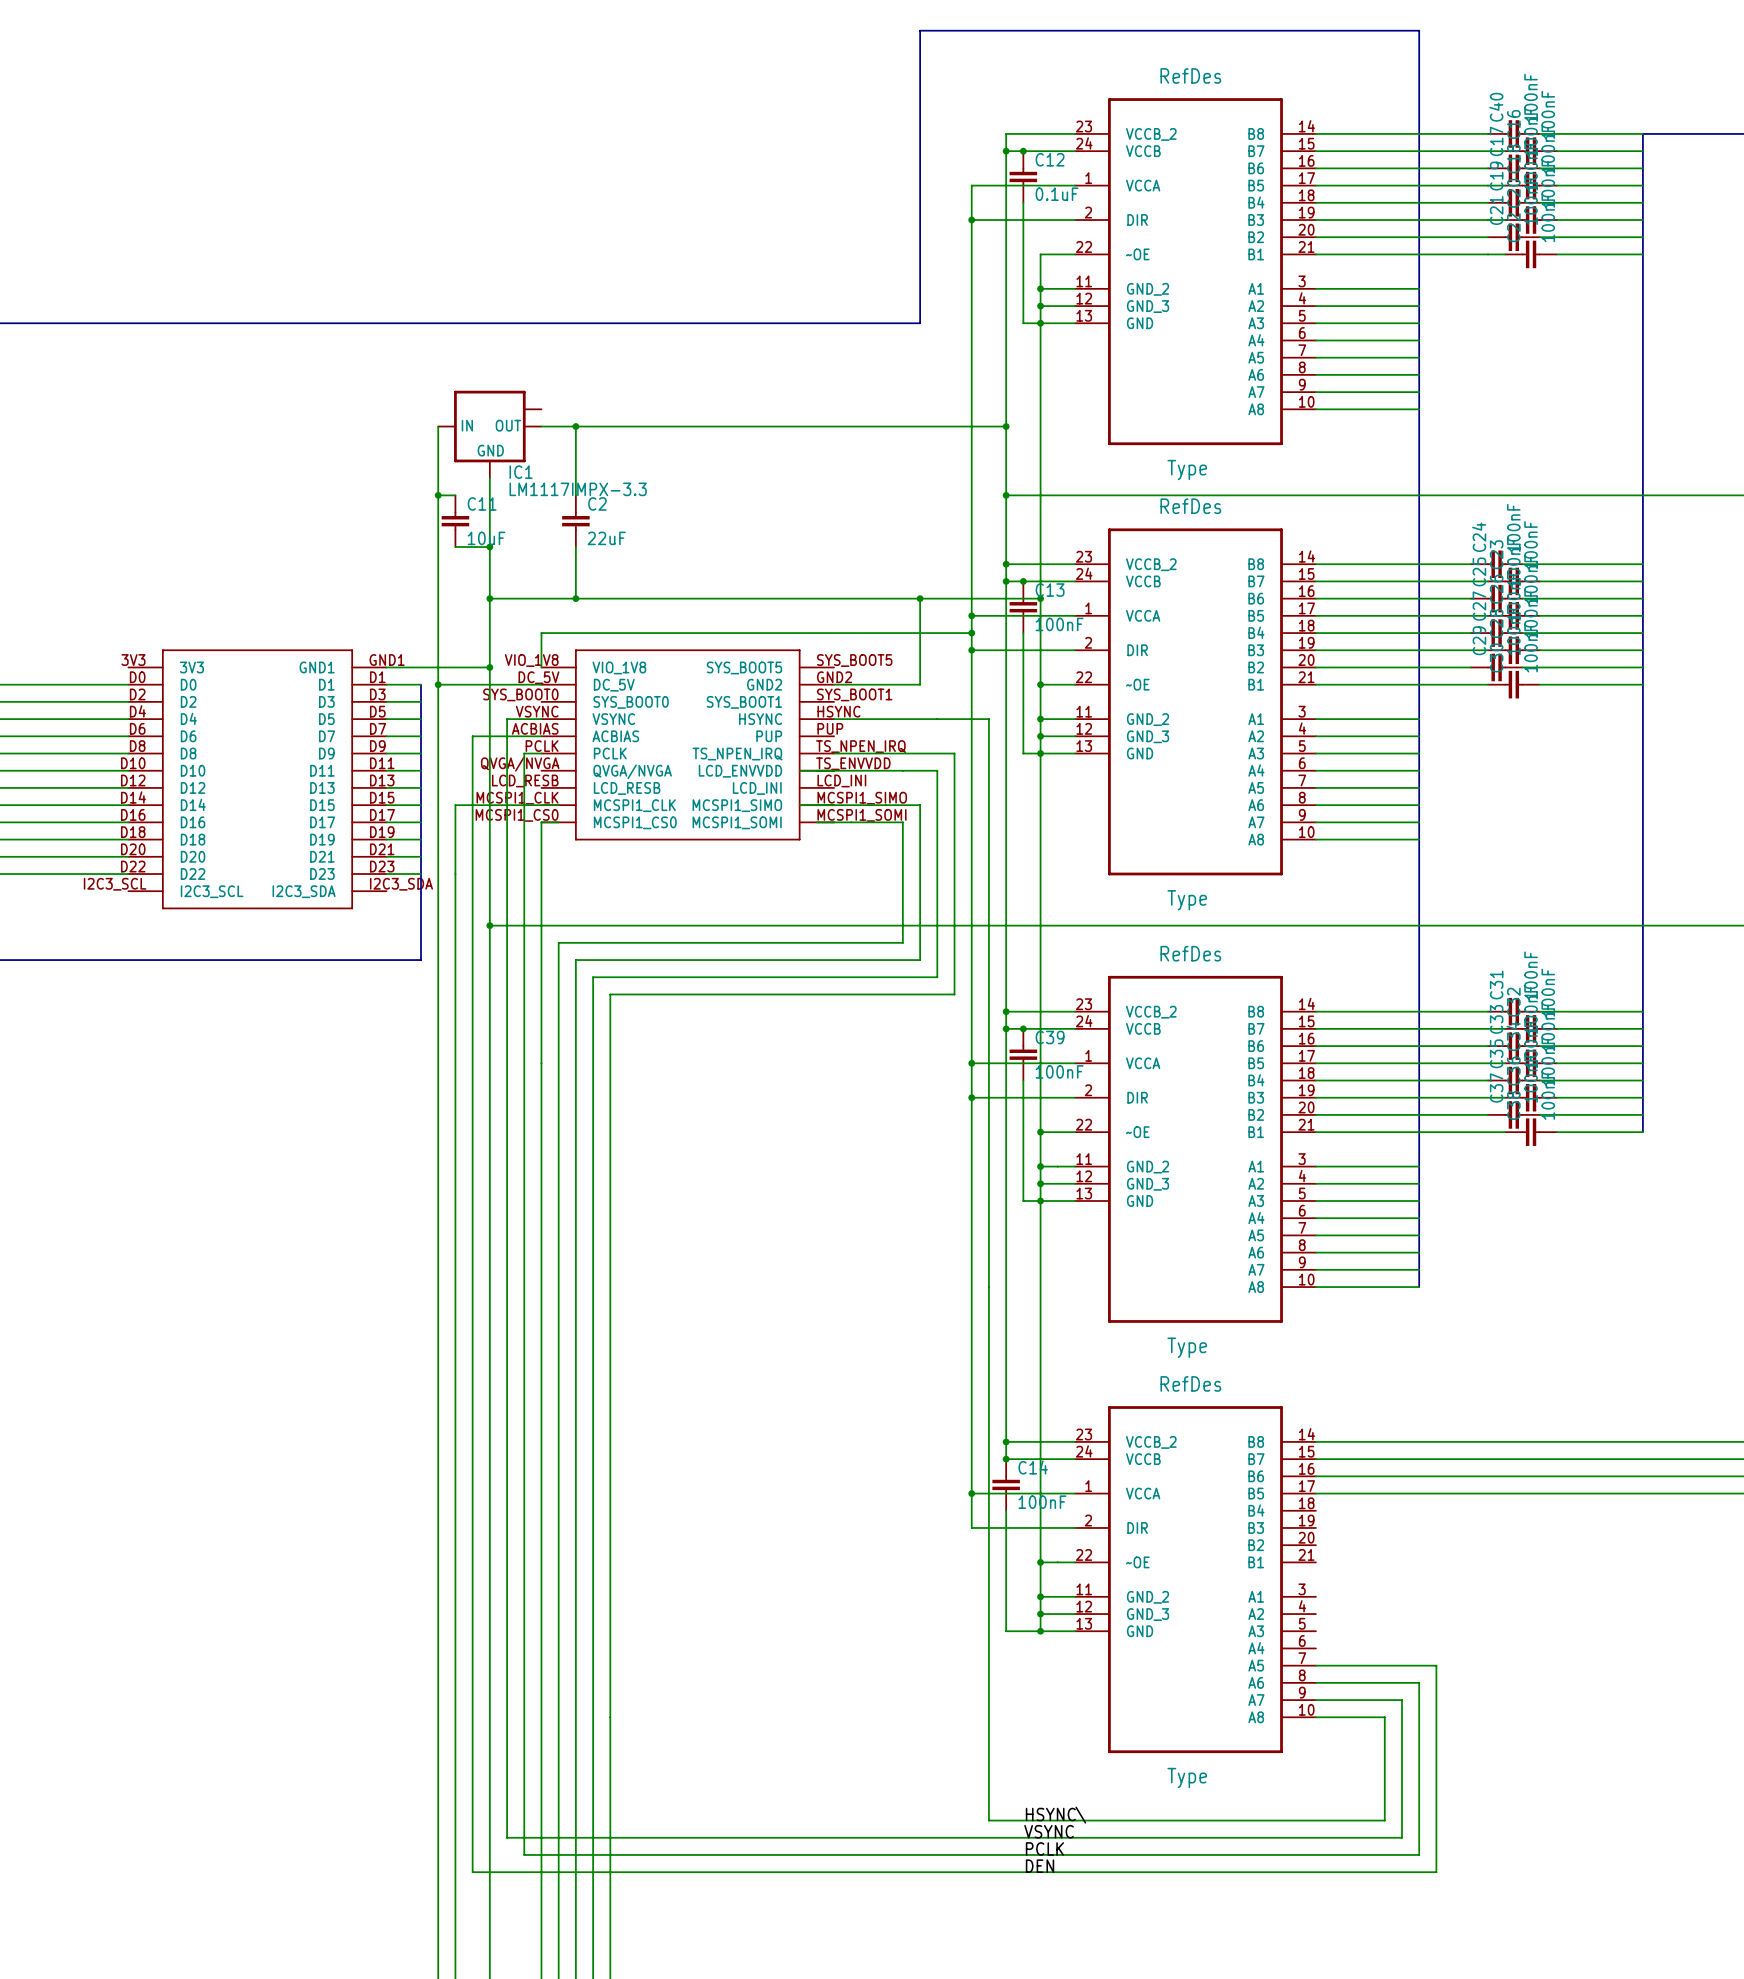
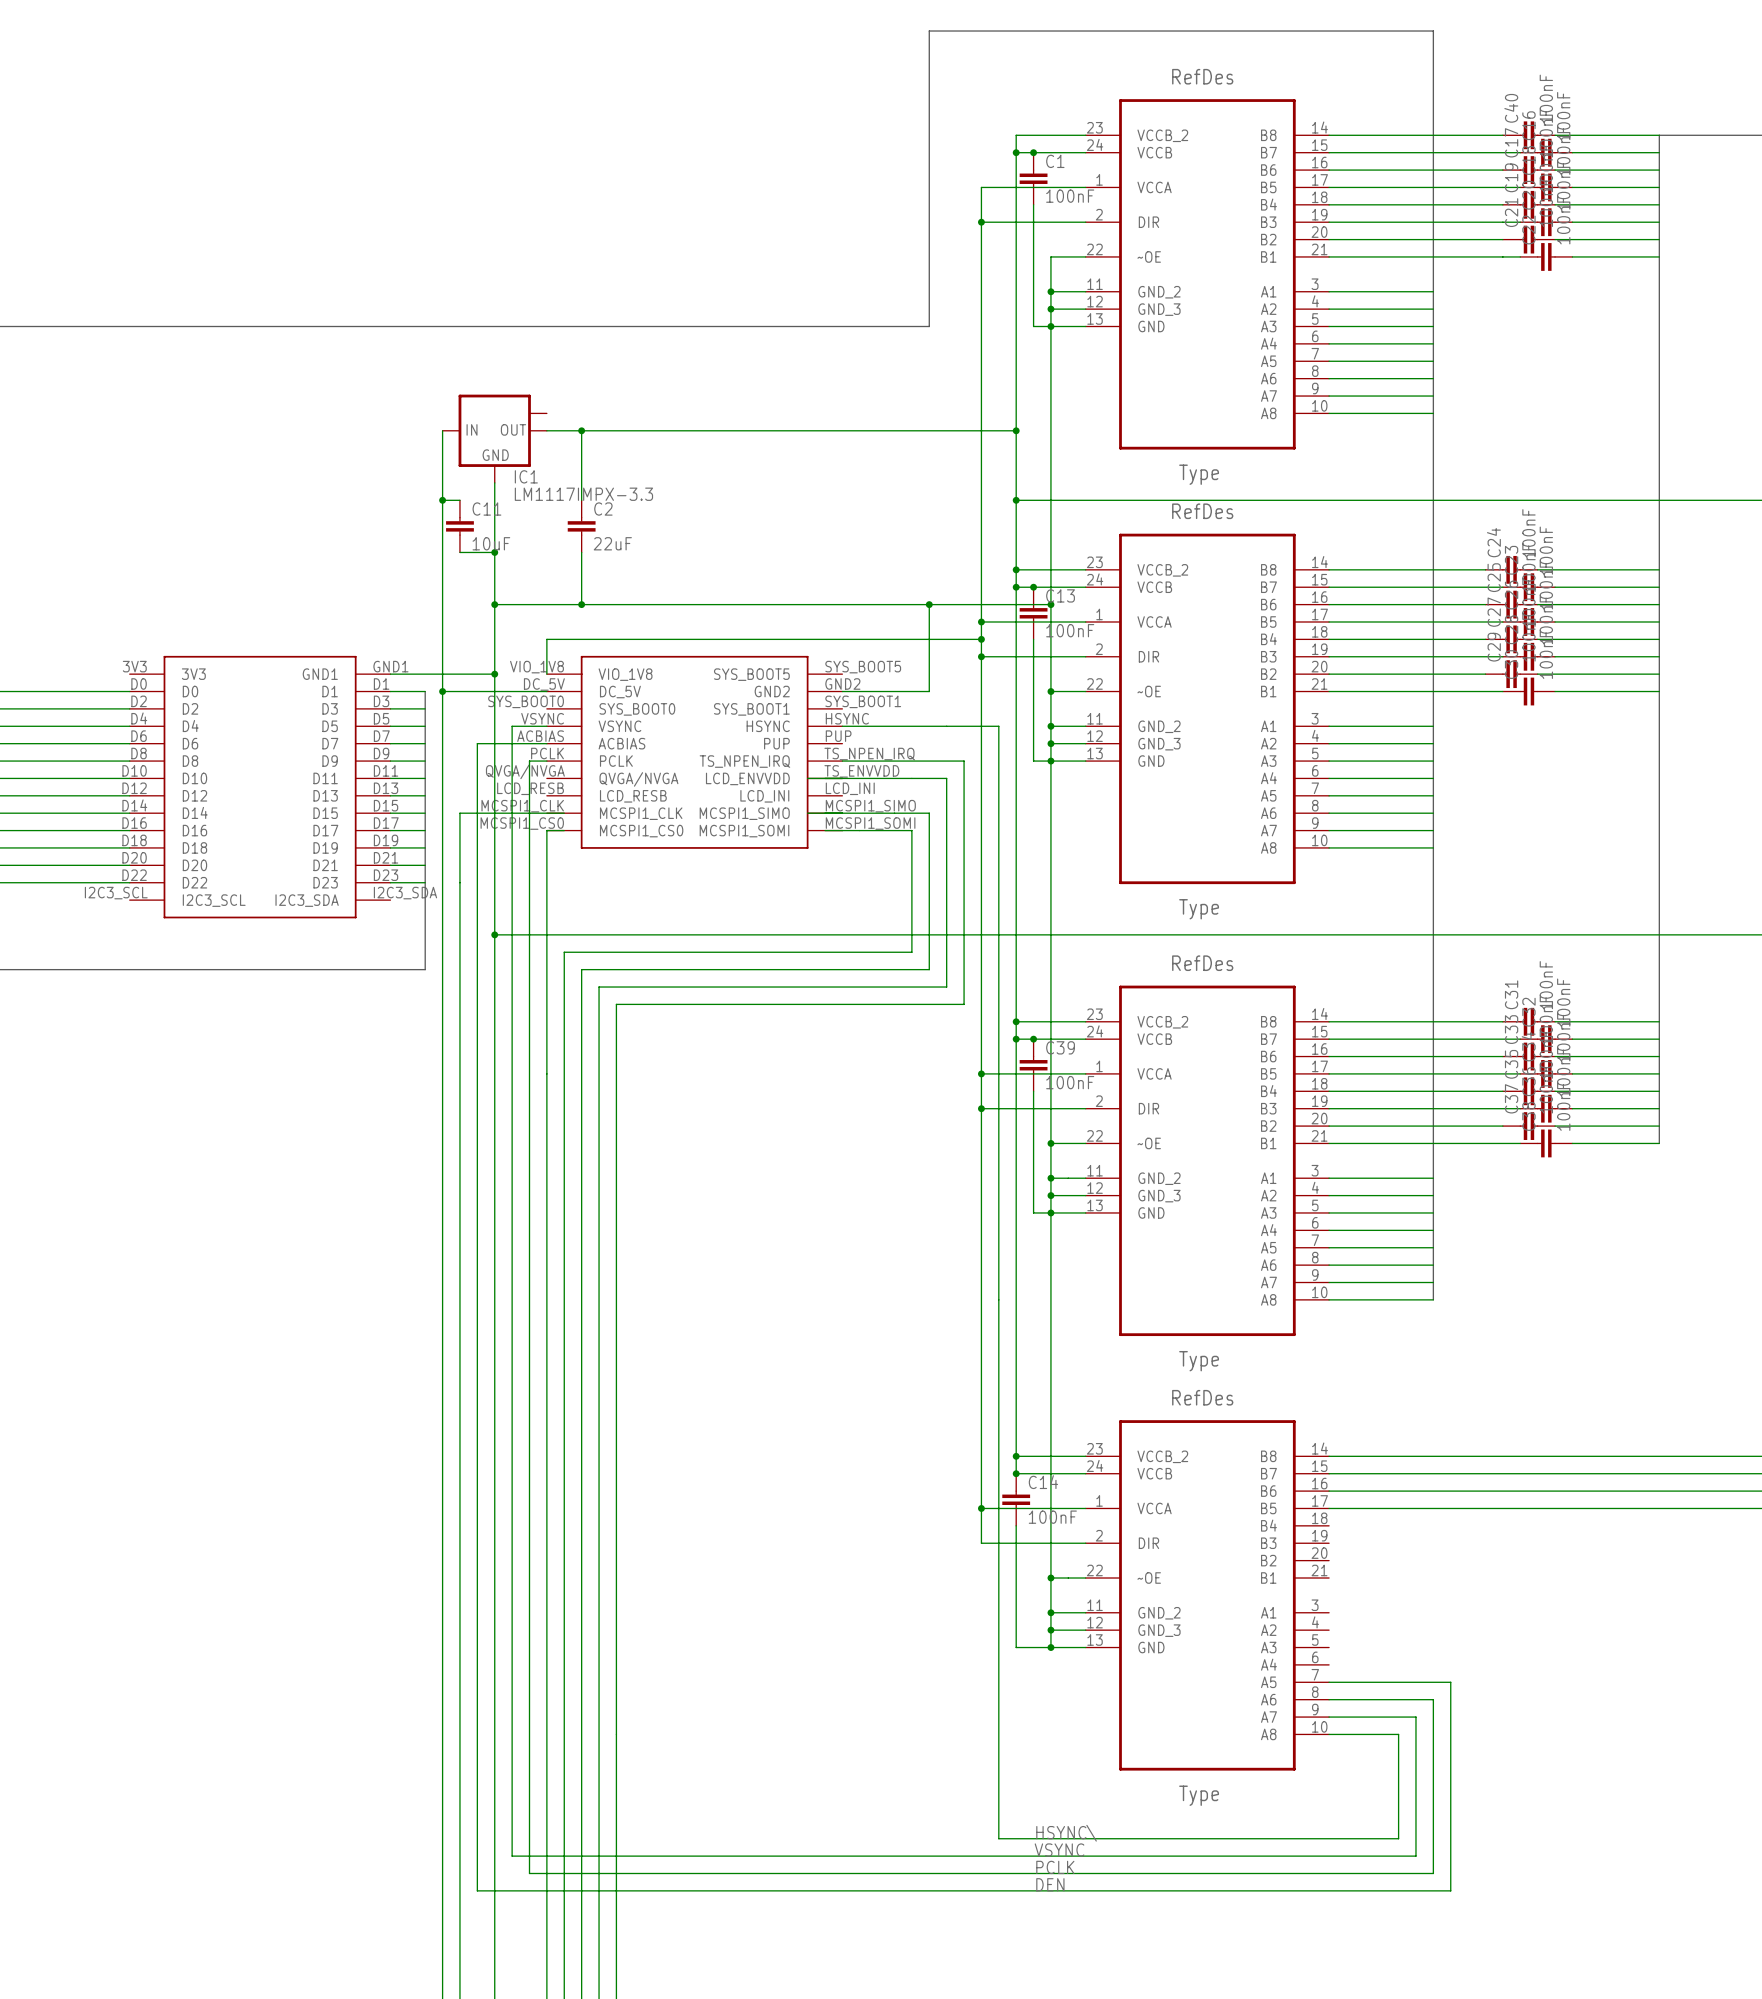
C12 name: C12 (1050, 159) -> C1 (1055, 161)
C12 value: 0.1uF (1057, 194) -> 100nF (1070, 196)

